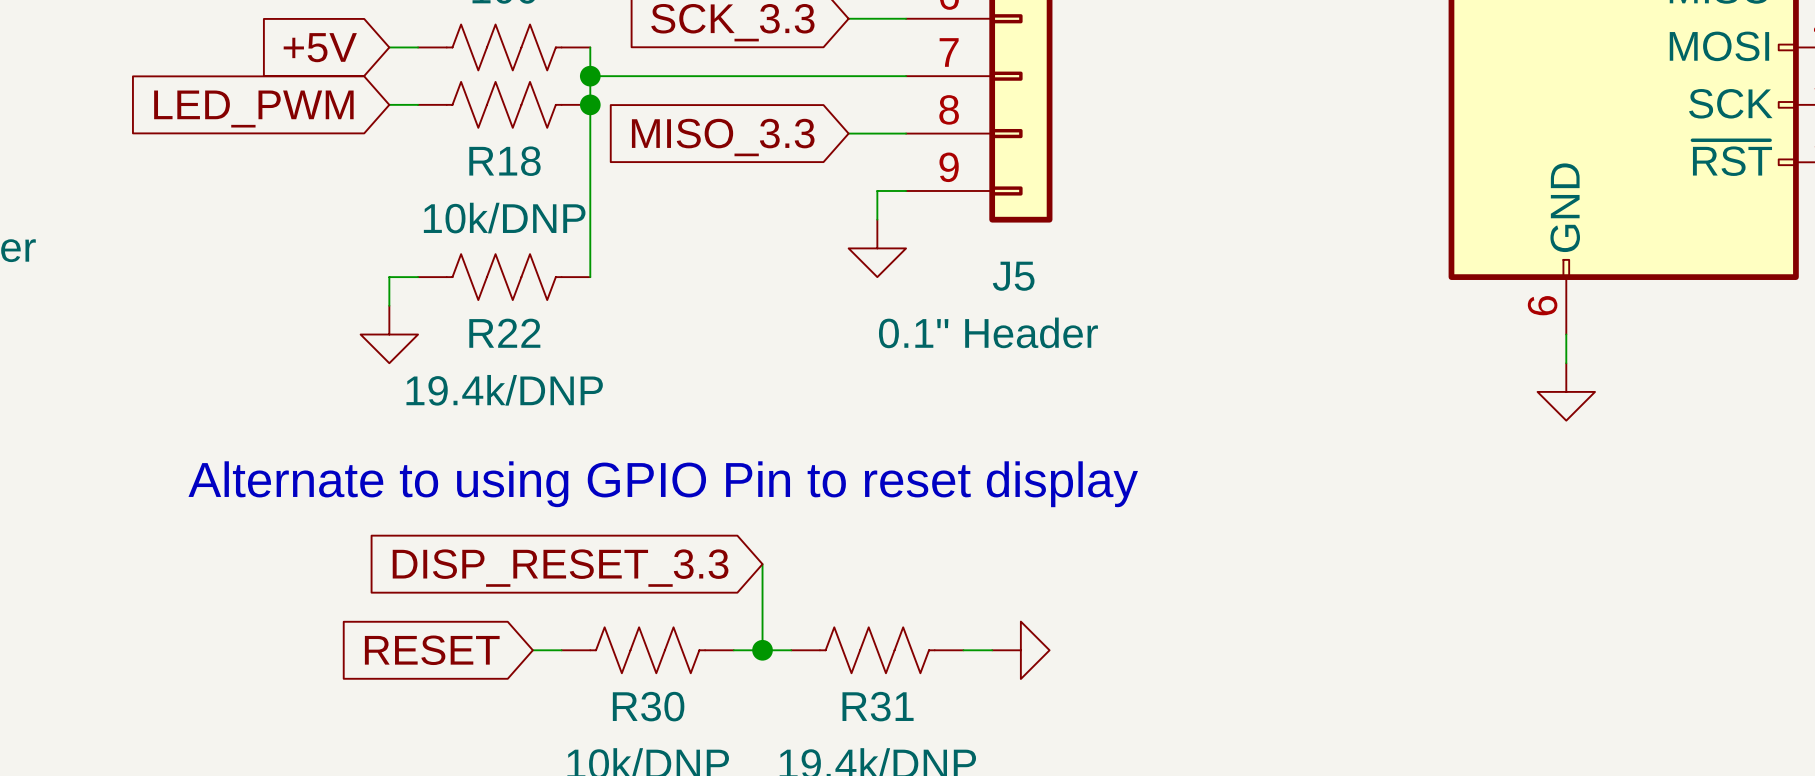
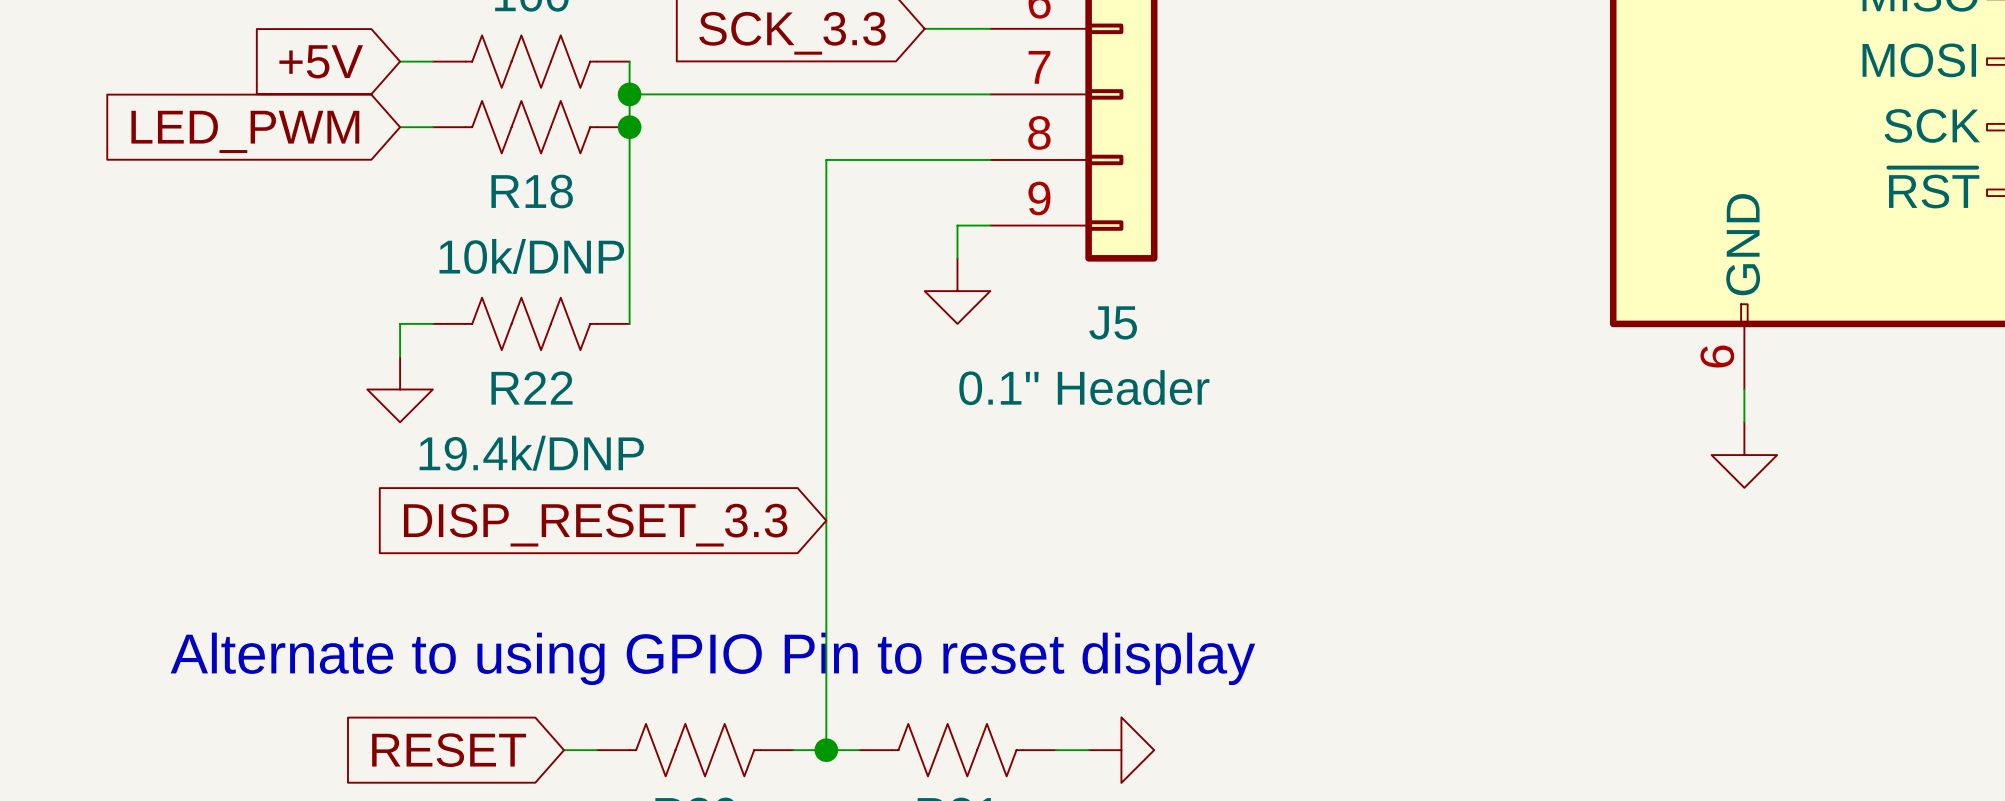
wire: none -> (924, 159) (826, 159) (826, 651)
global label: MISO_3.3 (723, 137) -> none
text position: Alternate to using GPIO Pin to reset display (663, 484) -> Alternate to using GPIO Pin to reset display (712, 658)
global label position: DISP_RESET_3.3 (560, 568) -> DISP_RESET_3.3 (595, 525)

